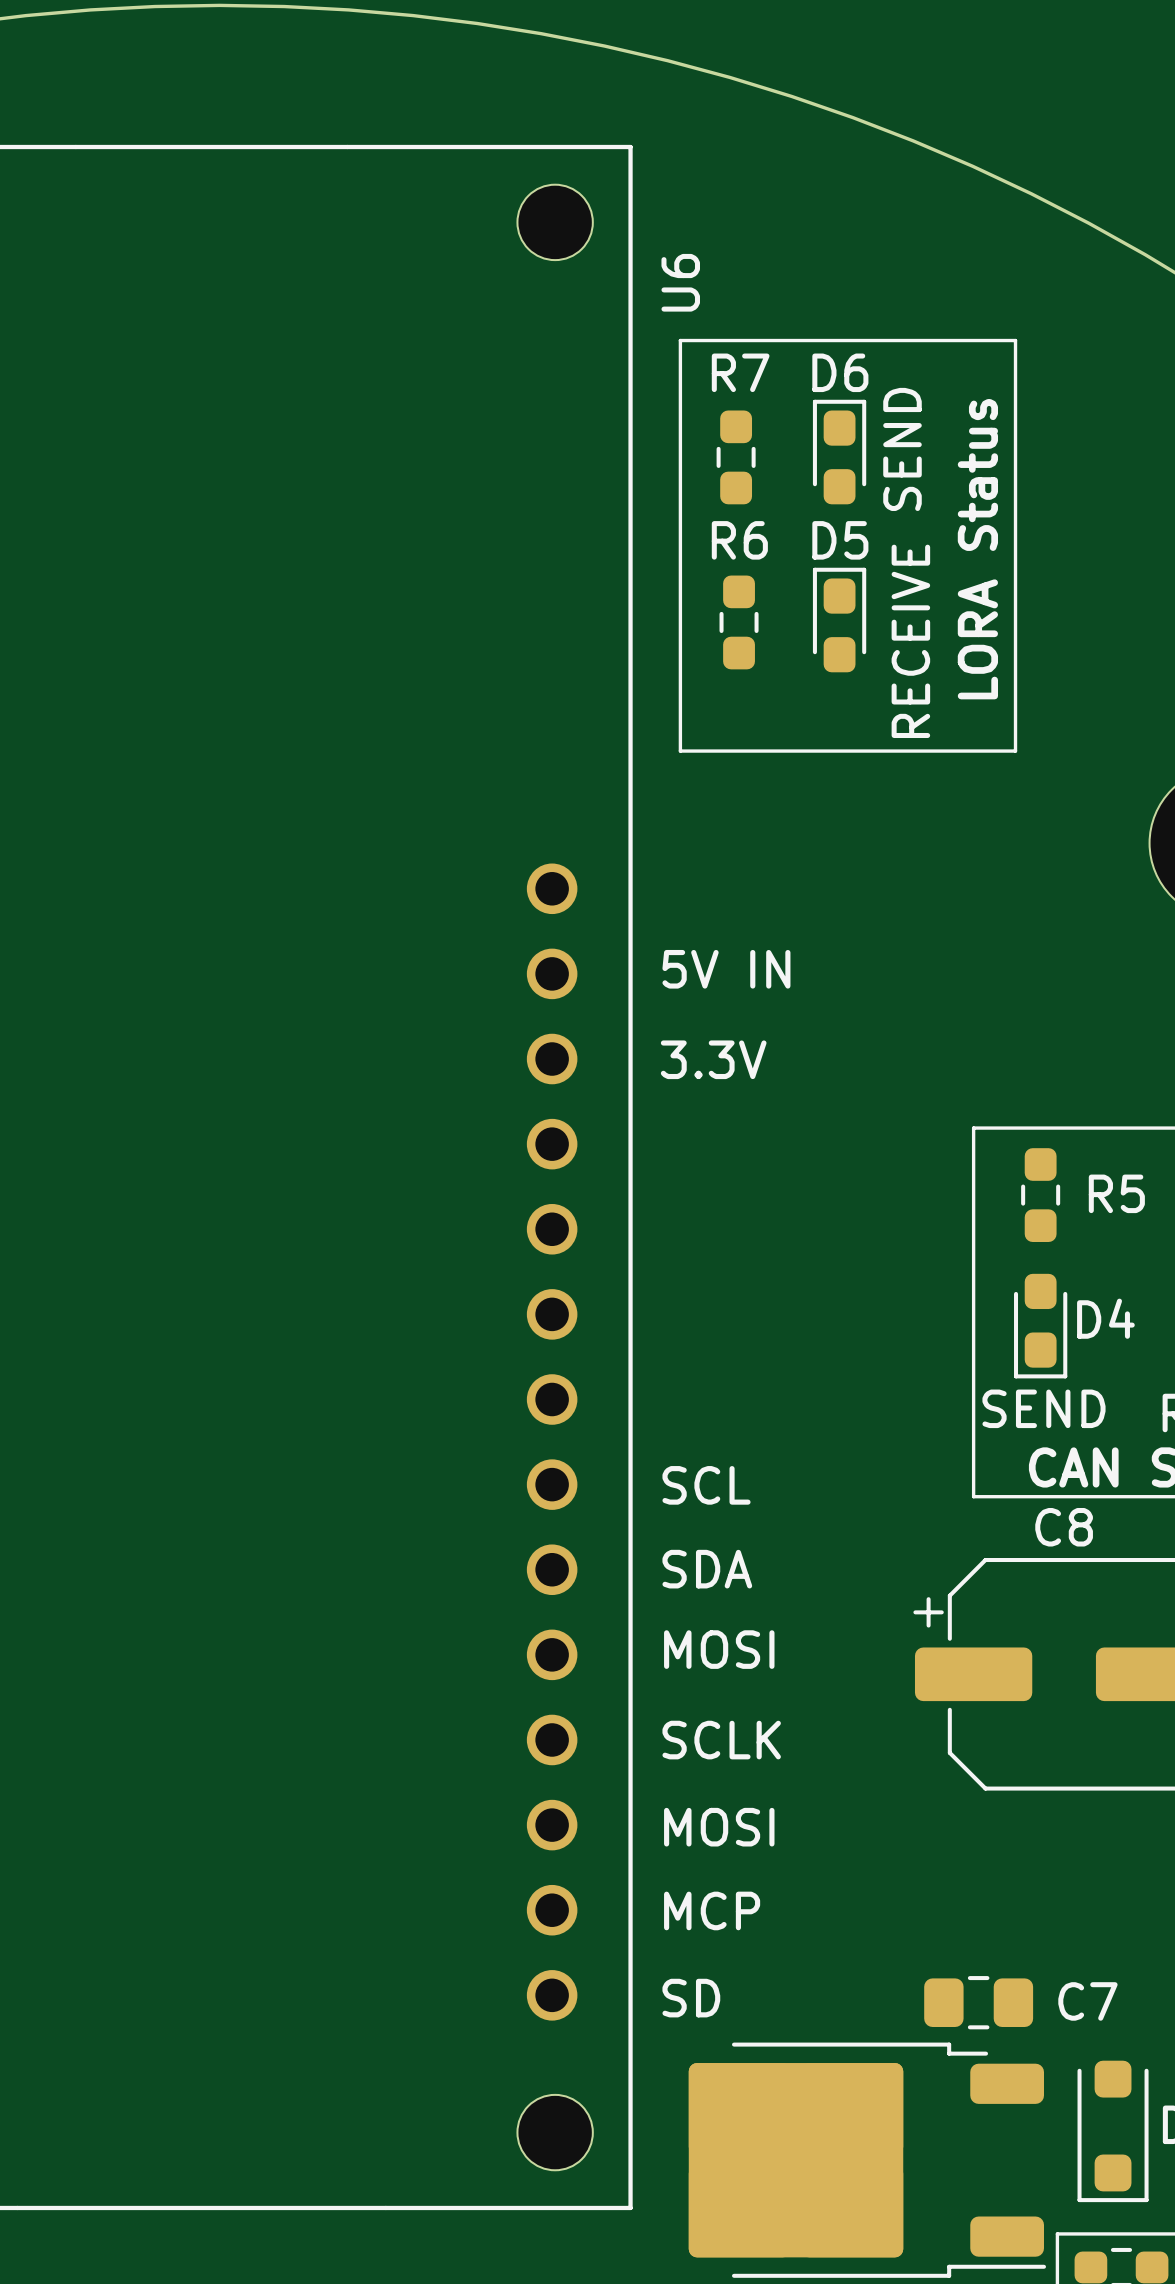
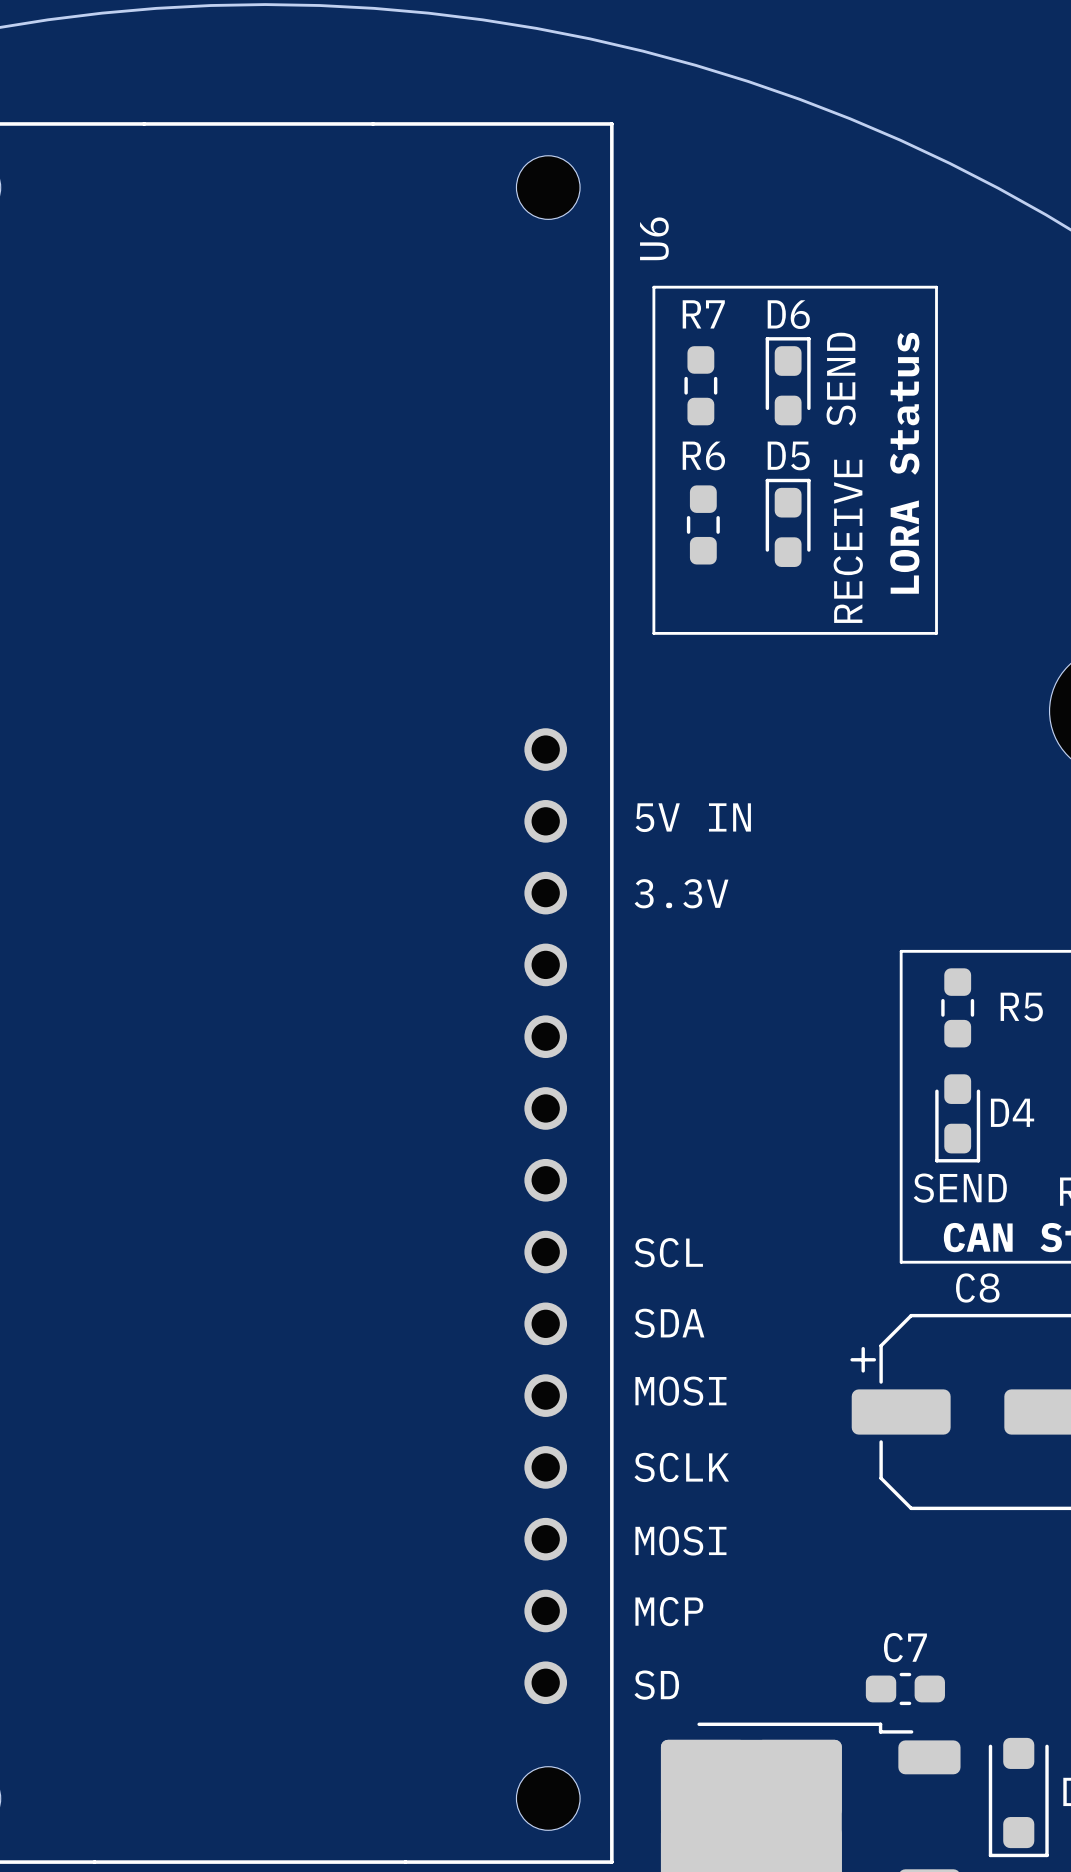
C7 footprint: [924, 1976, 1034, 2030] -> [865, 1672, 945, 1706]
C7 name position: C7 (1087, 2001) -> C7 (905, 1647)

